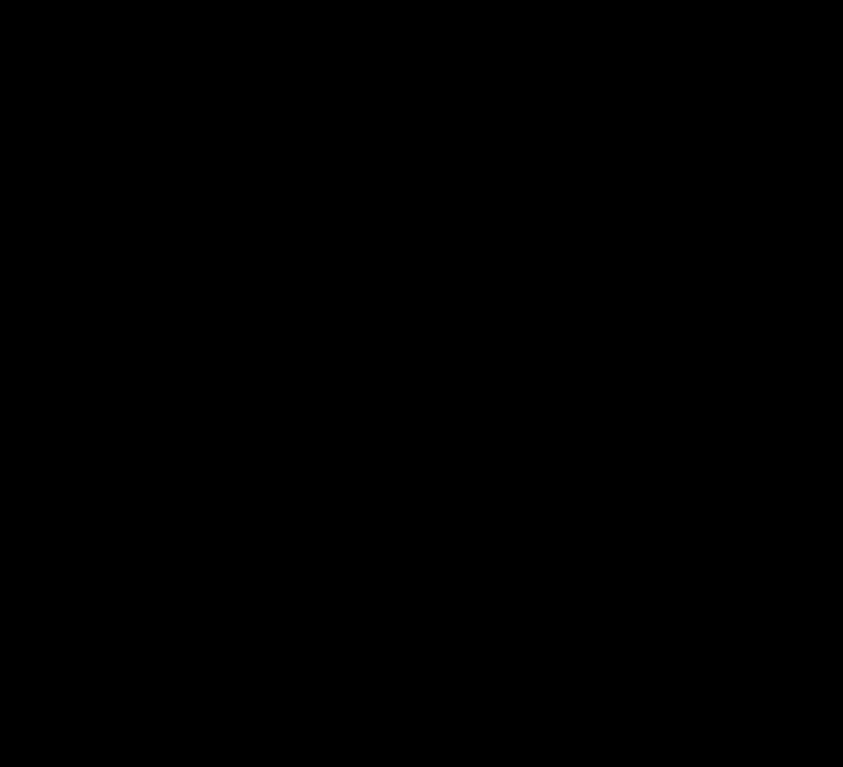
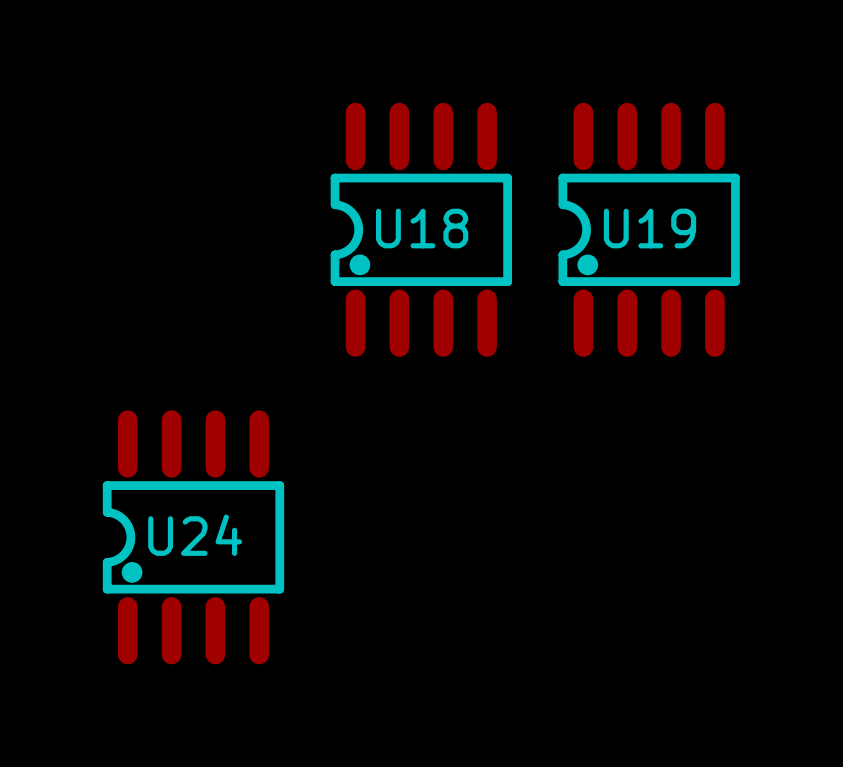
U18: none -> (421, 229)
U19: none -> (649, 229)
U24: none -> (193, 537)

